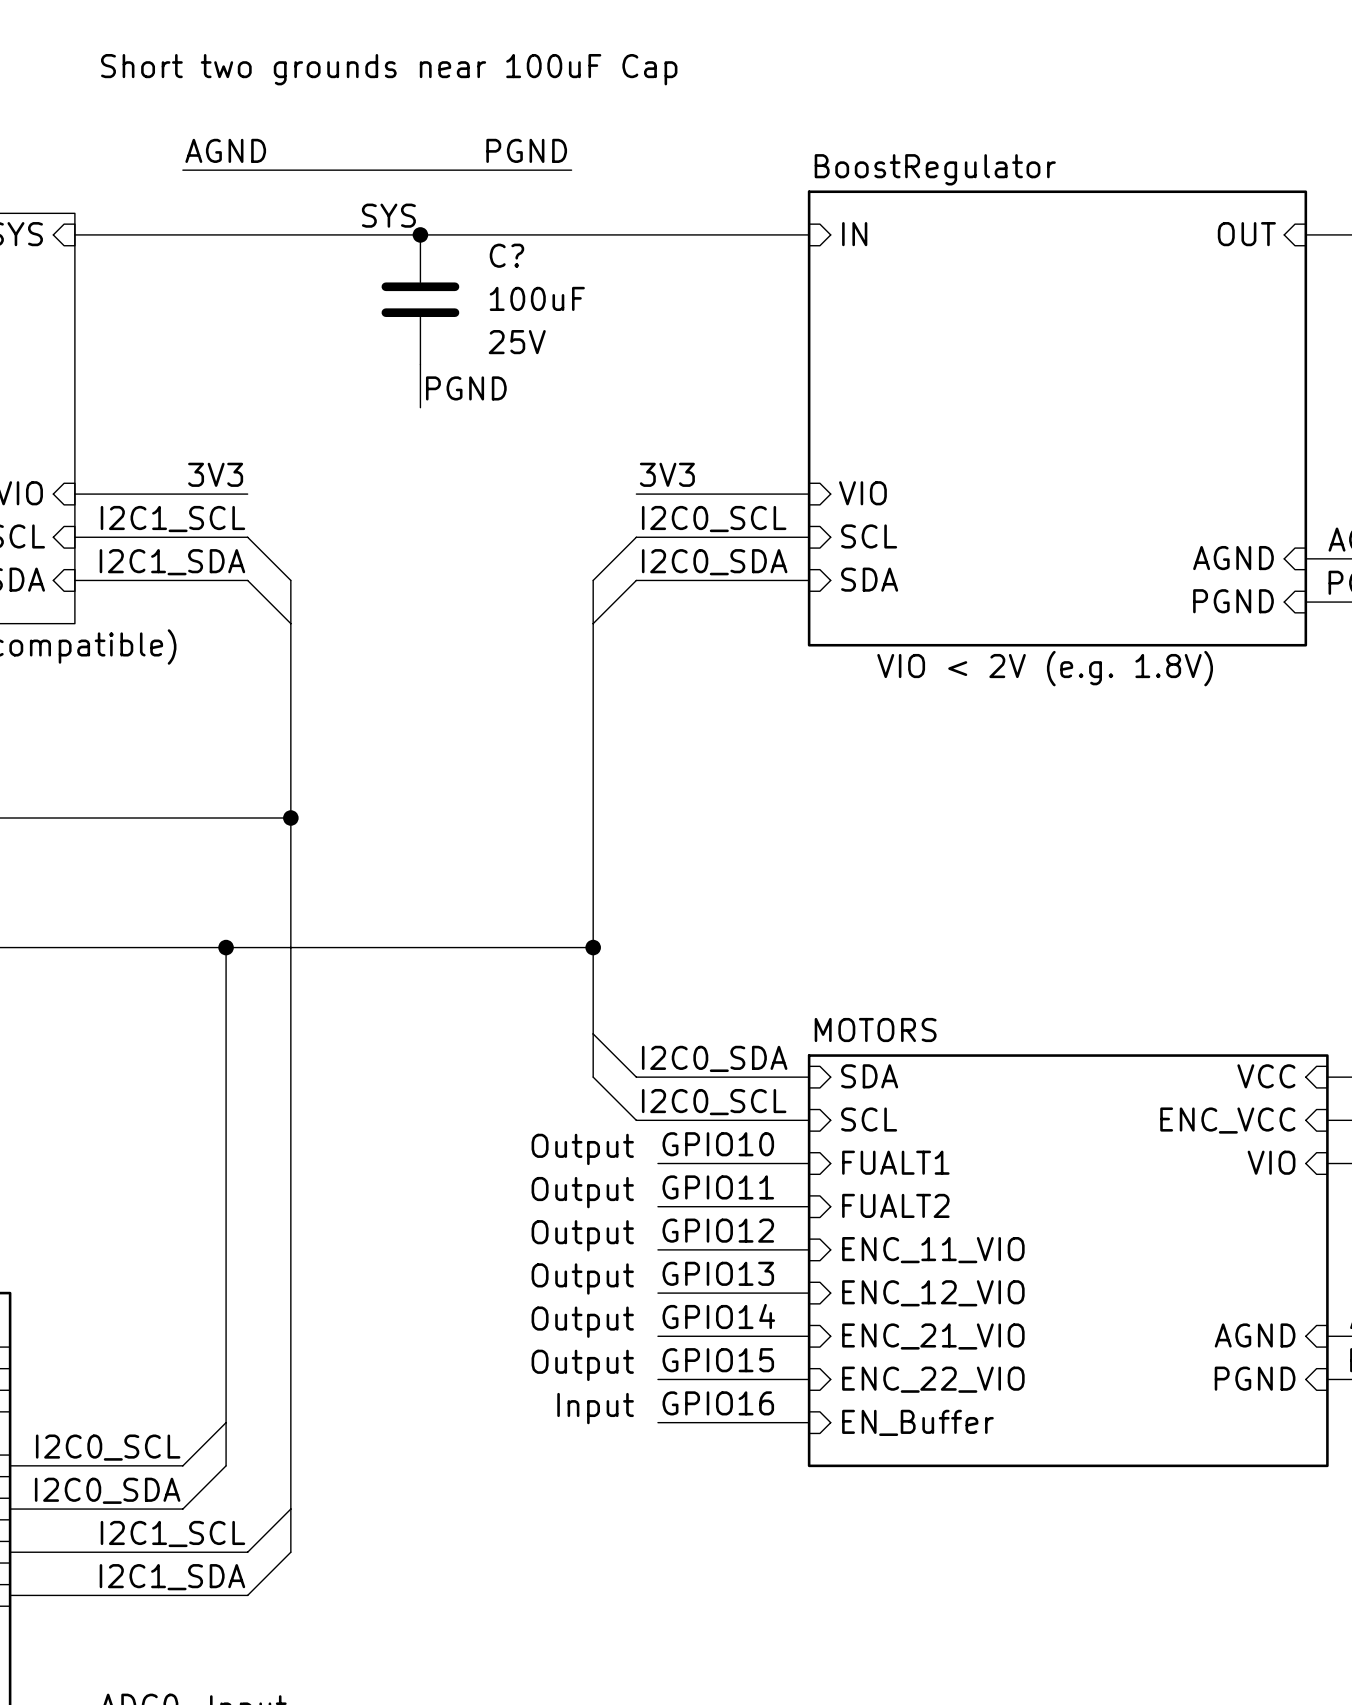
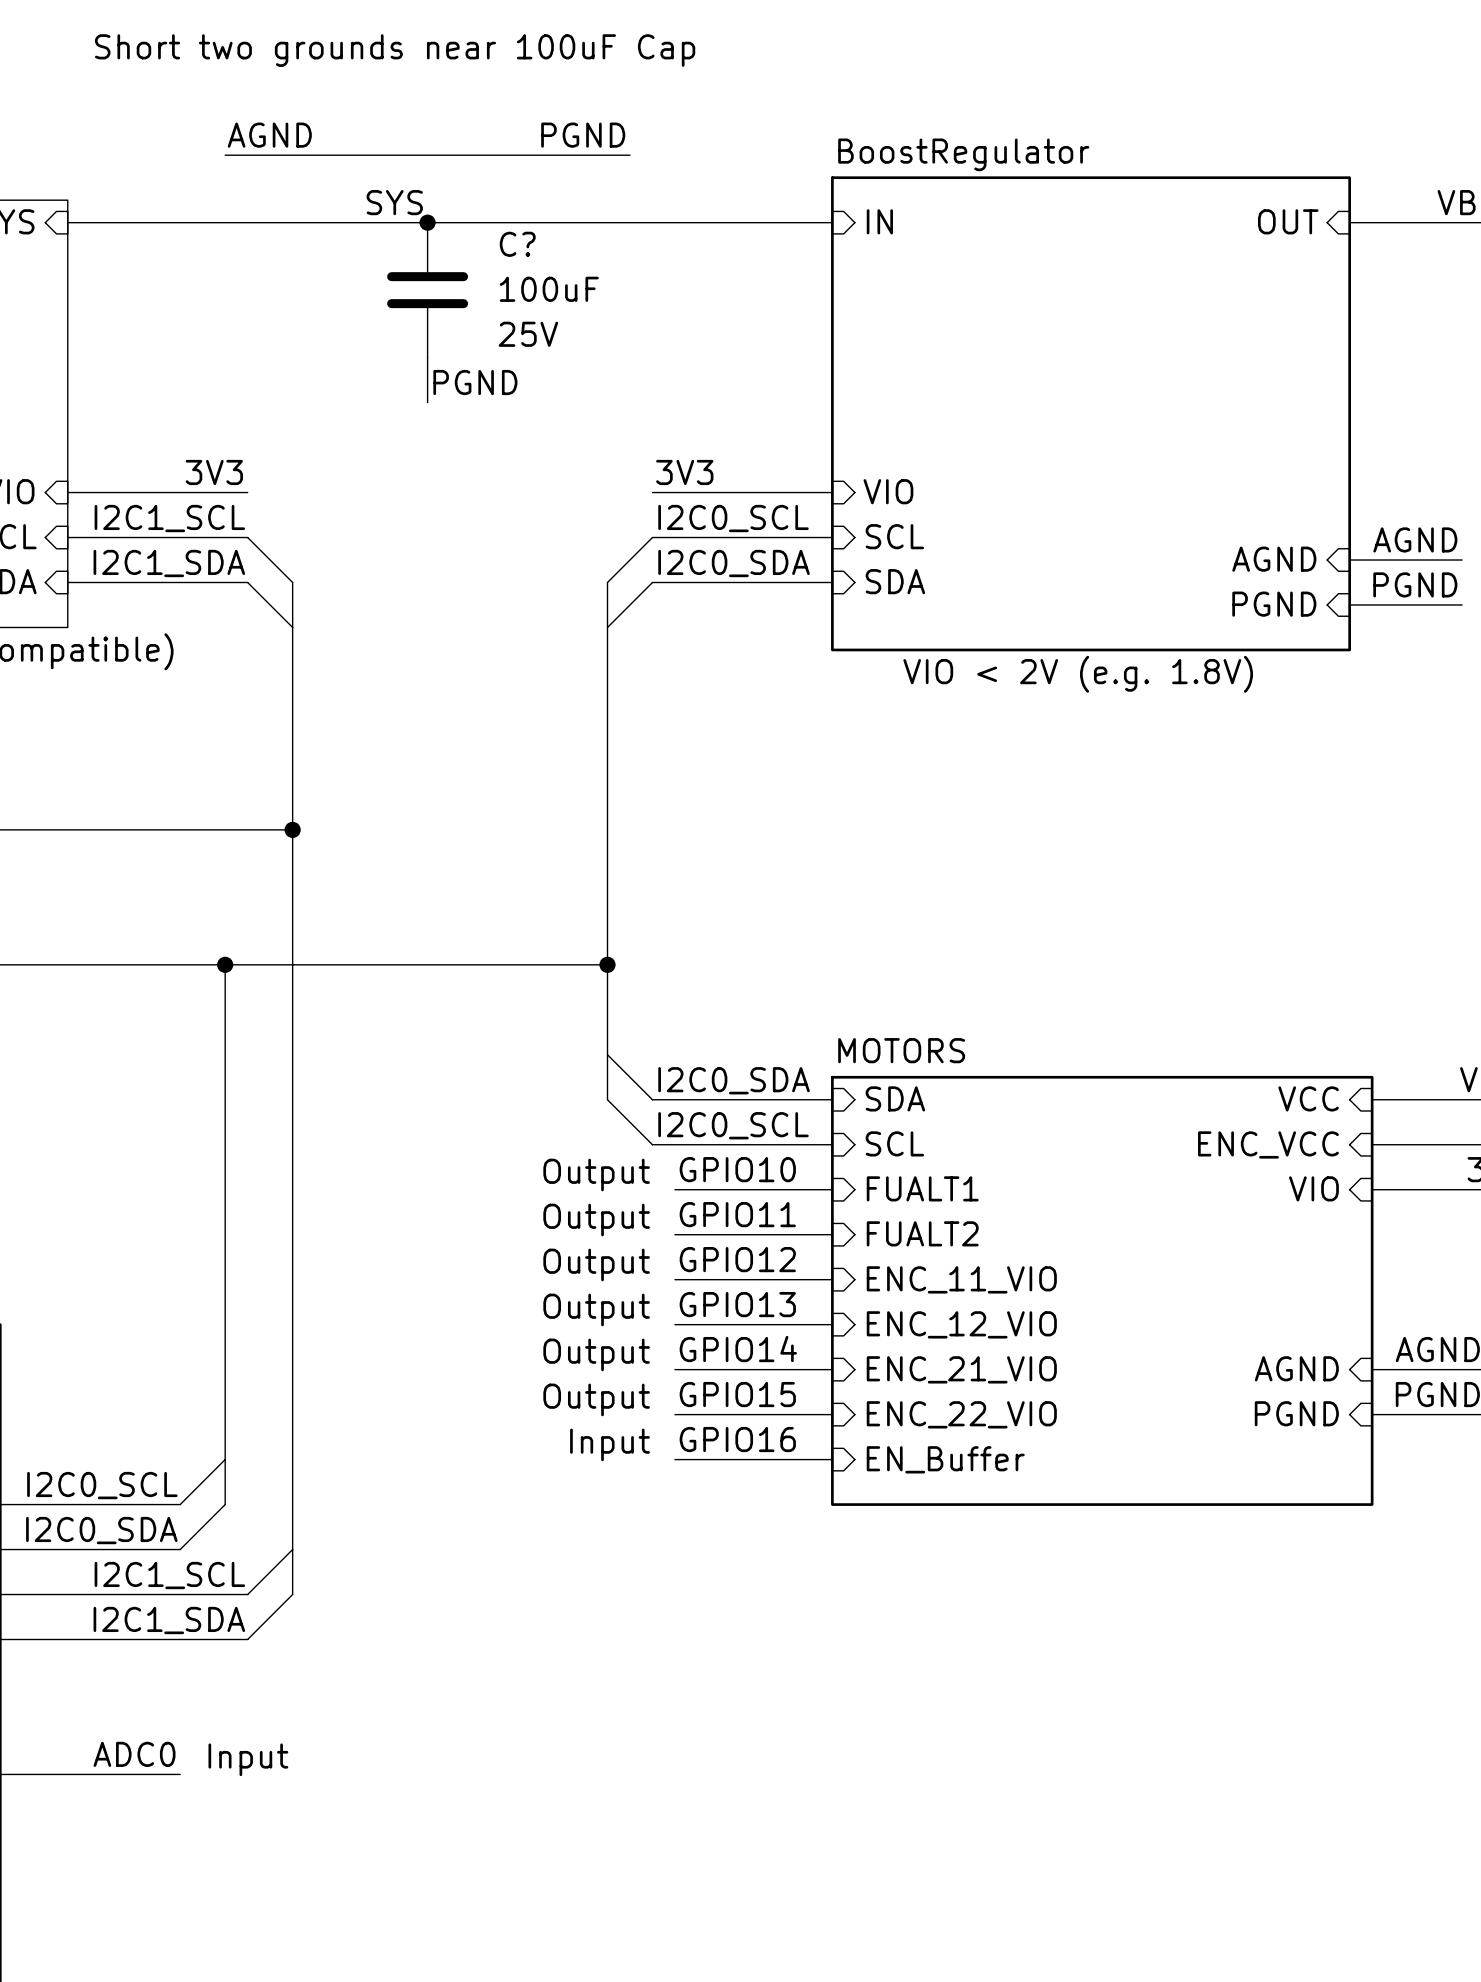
label position: AGND (225, 150) -> AGND (269, 135)
label position: PGND (526, 150) -> PGND (583, 135)
wire: (182, 170) (226, 170) -> (585, 155) (629, 155)

